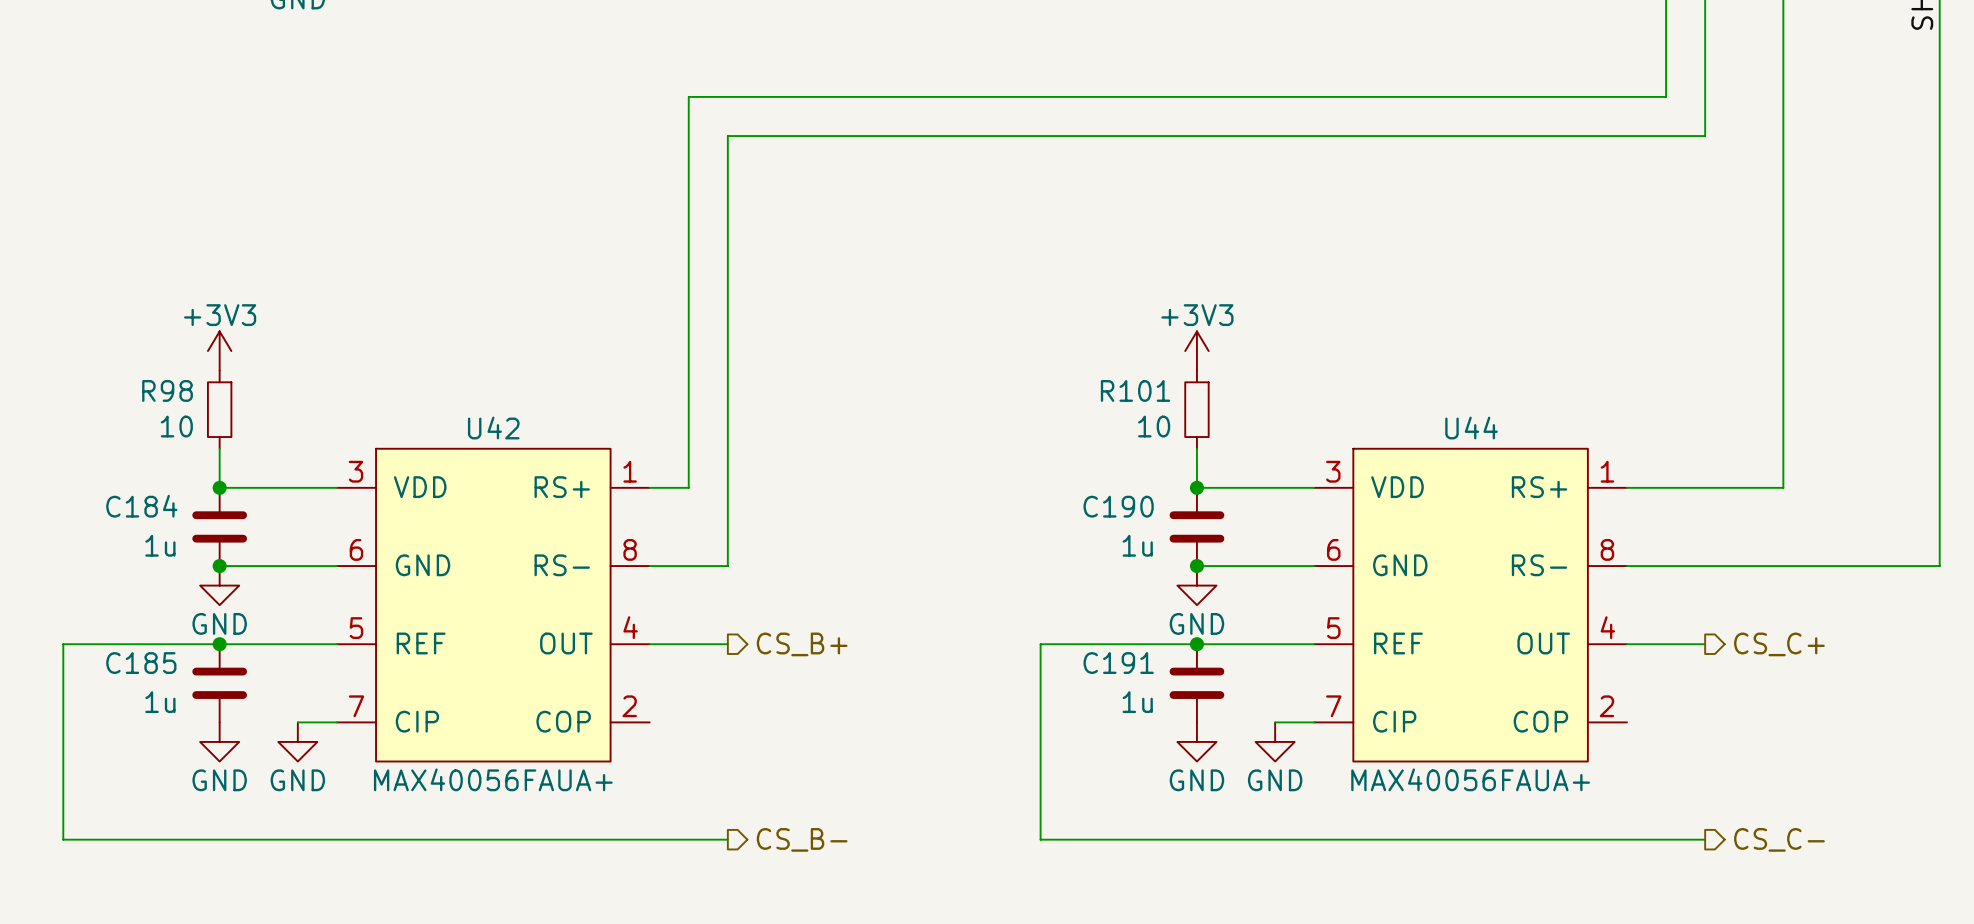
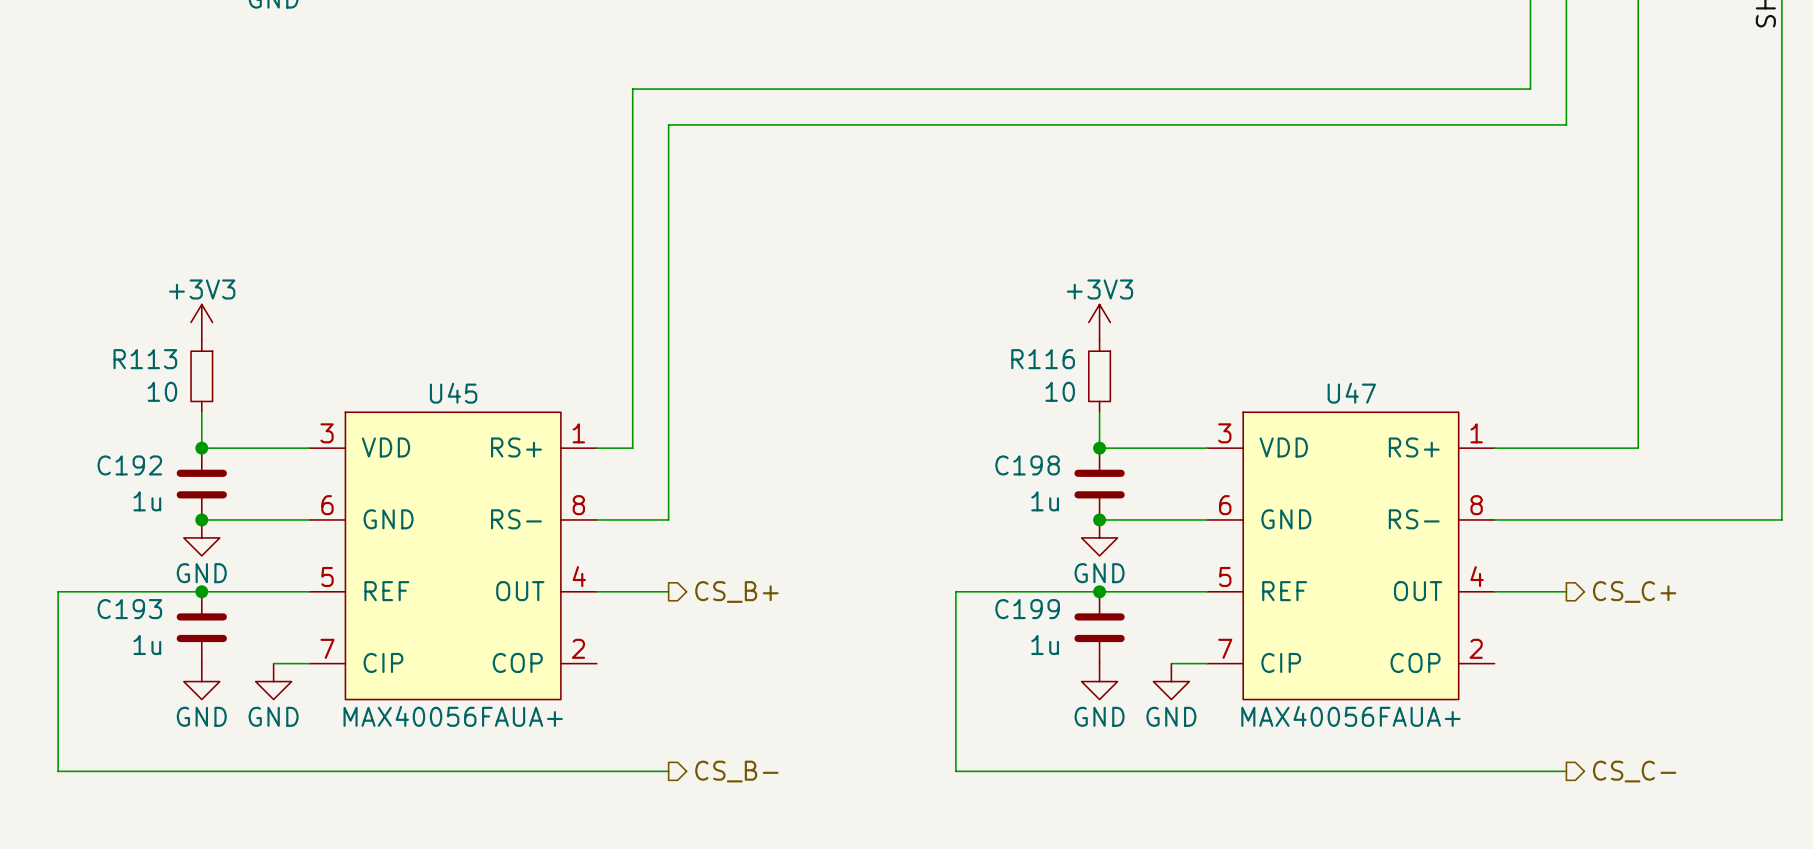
R98 name: R98 (167, 390) -> R113 (145, 359)
R101 name: R101 (1135, 390) -> R116 (1043, 359)
U42 name: U42 (493, 428) -> U45 (453, 393)
U44 name: U44 (1471, 428) -> U47 (1351, 393)
C184 name: C184 (141, 506) -> C192 (129, 465)
C190 name: C190 (1118, 506) -> C198 (1027, 465)
C185 name: C185 (141, 663) -> C193 (129, 609)
C191 name: C191 (1118, 663) -> C199 (1027, 609)

